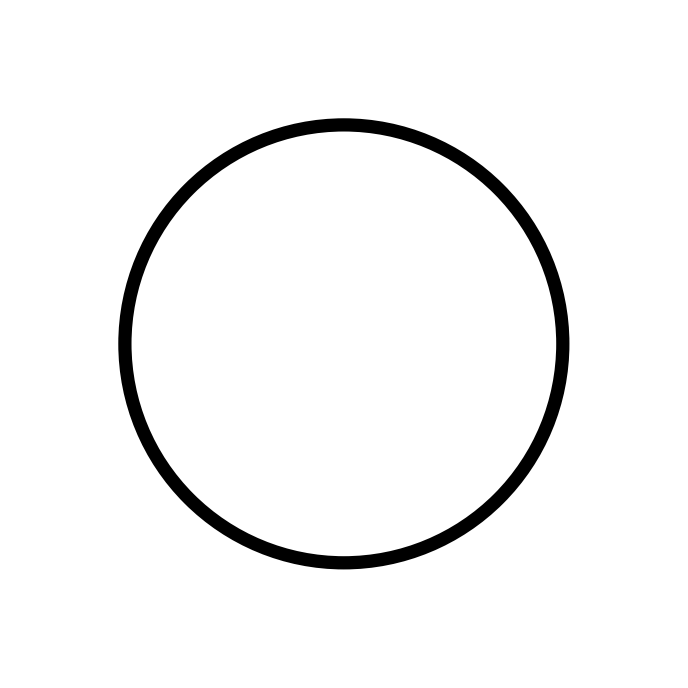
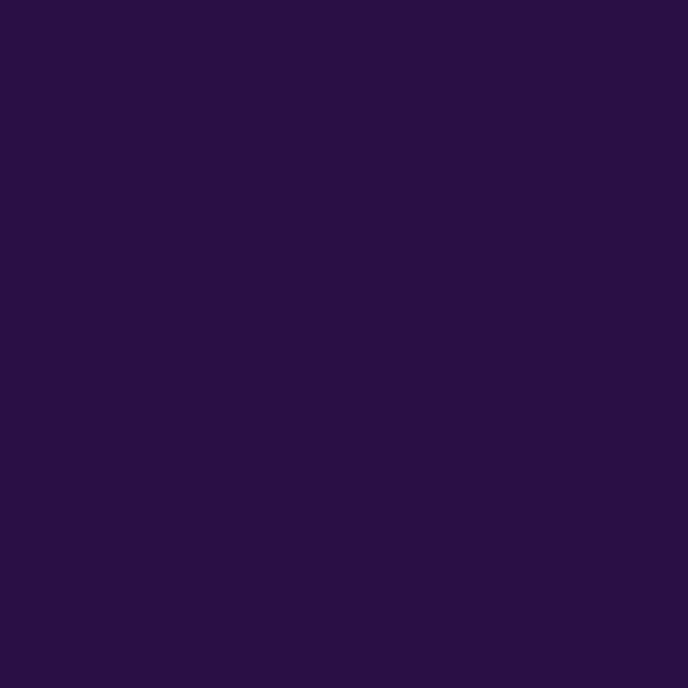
round board edge: [118, 118, 570, 570] -> none

